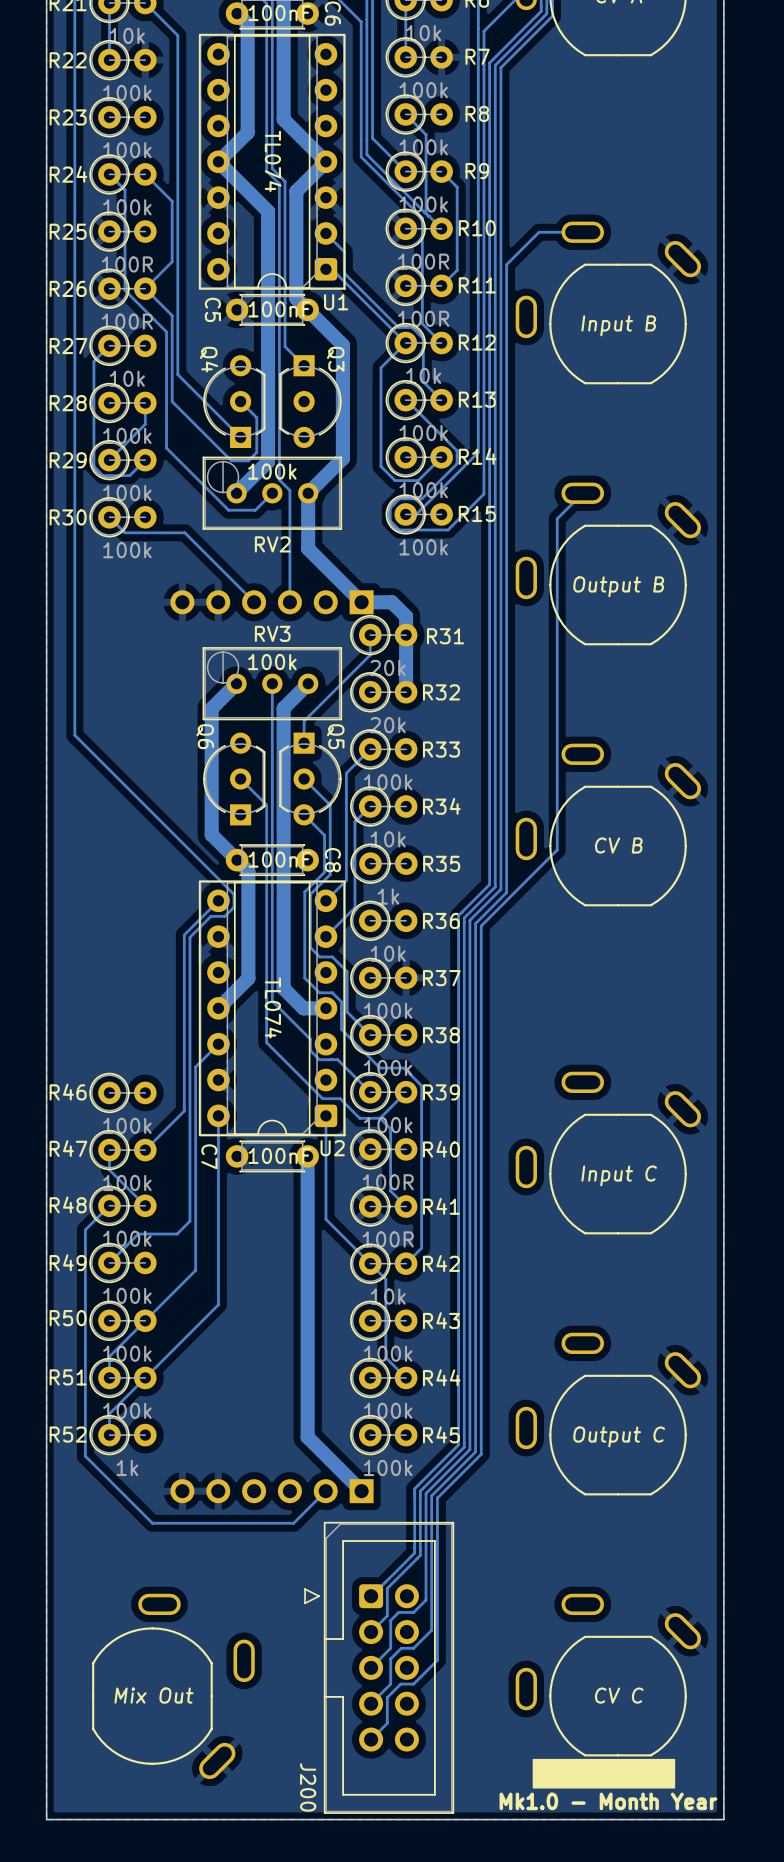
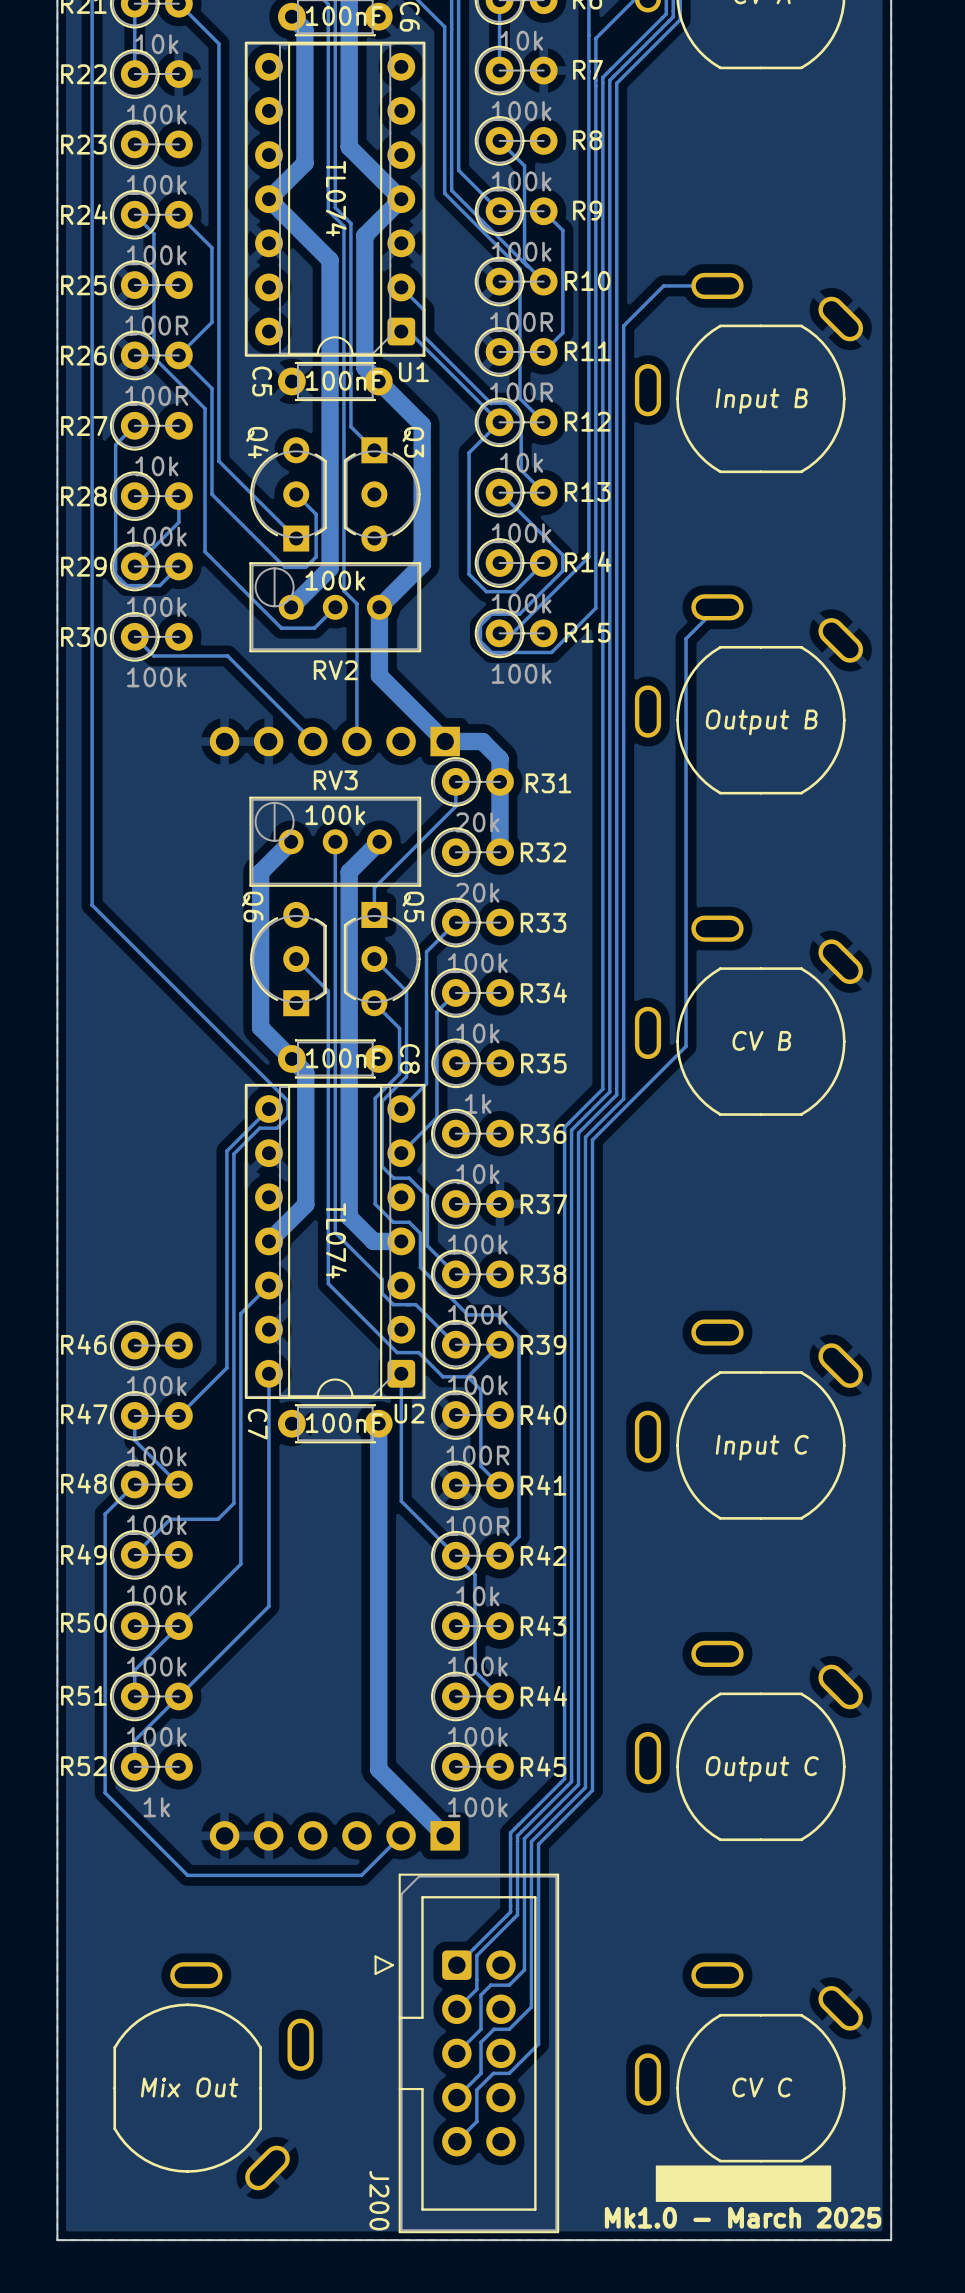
text: Mk1.0 - Month Year (608, 1801) -> Mk1.0 - March 2025 (743, 2217)

